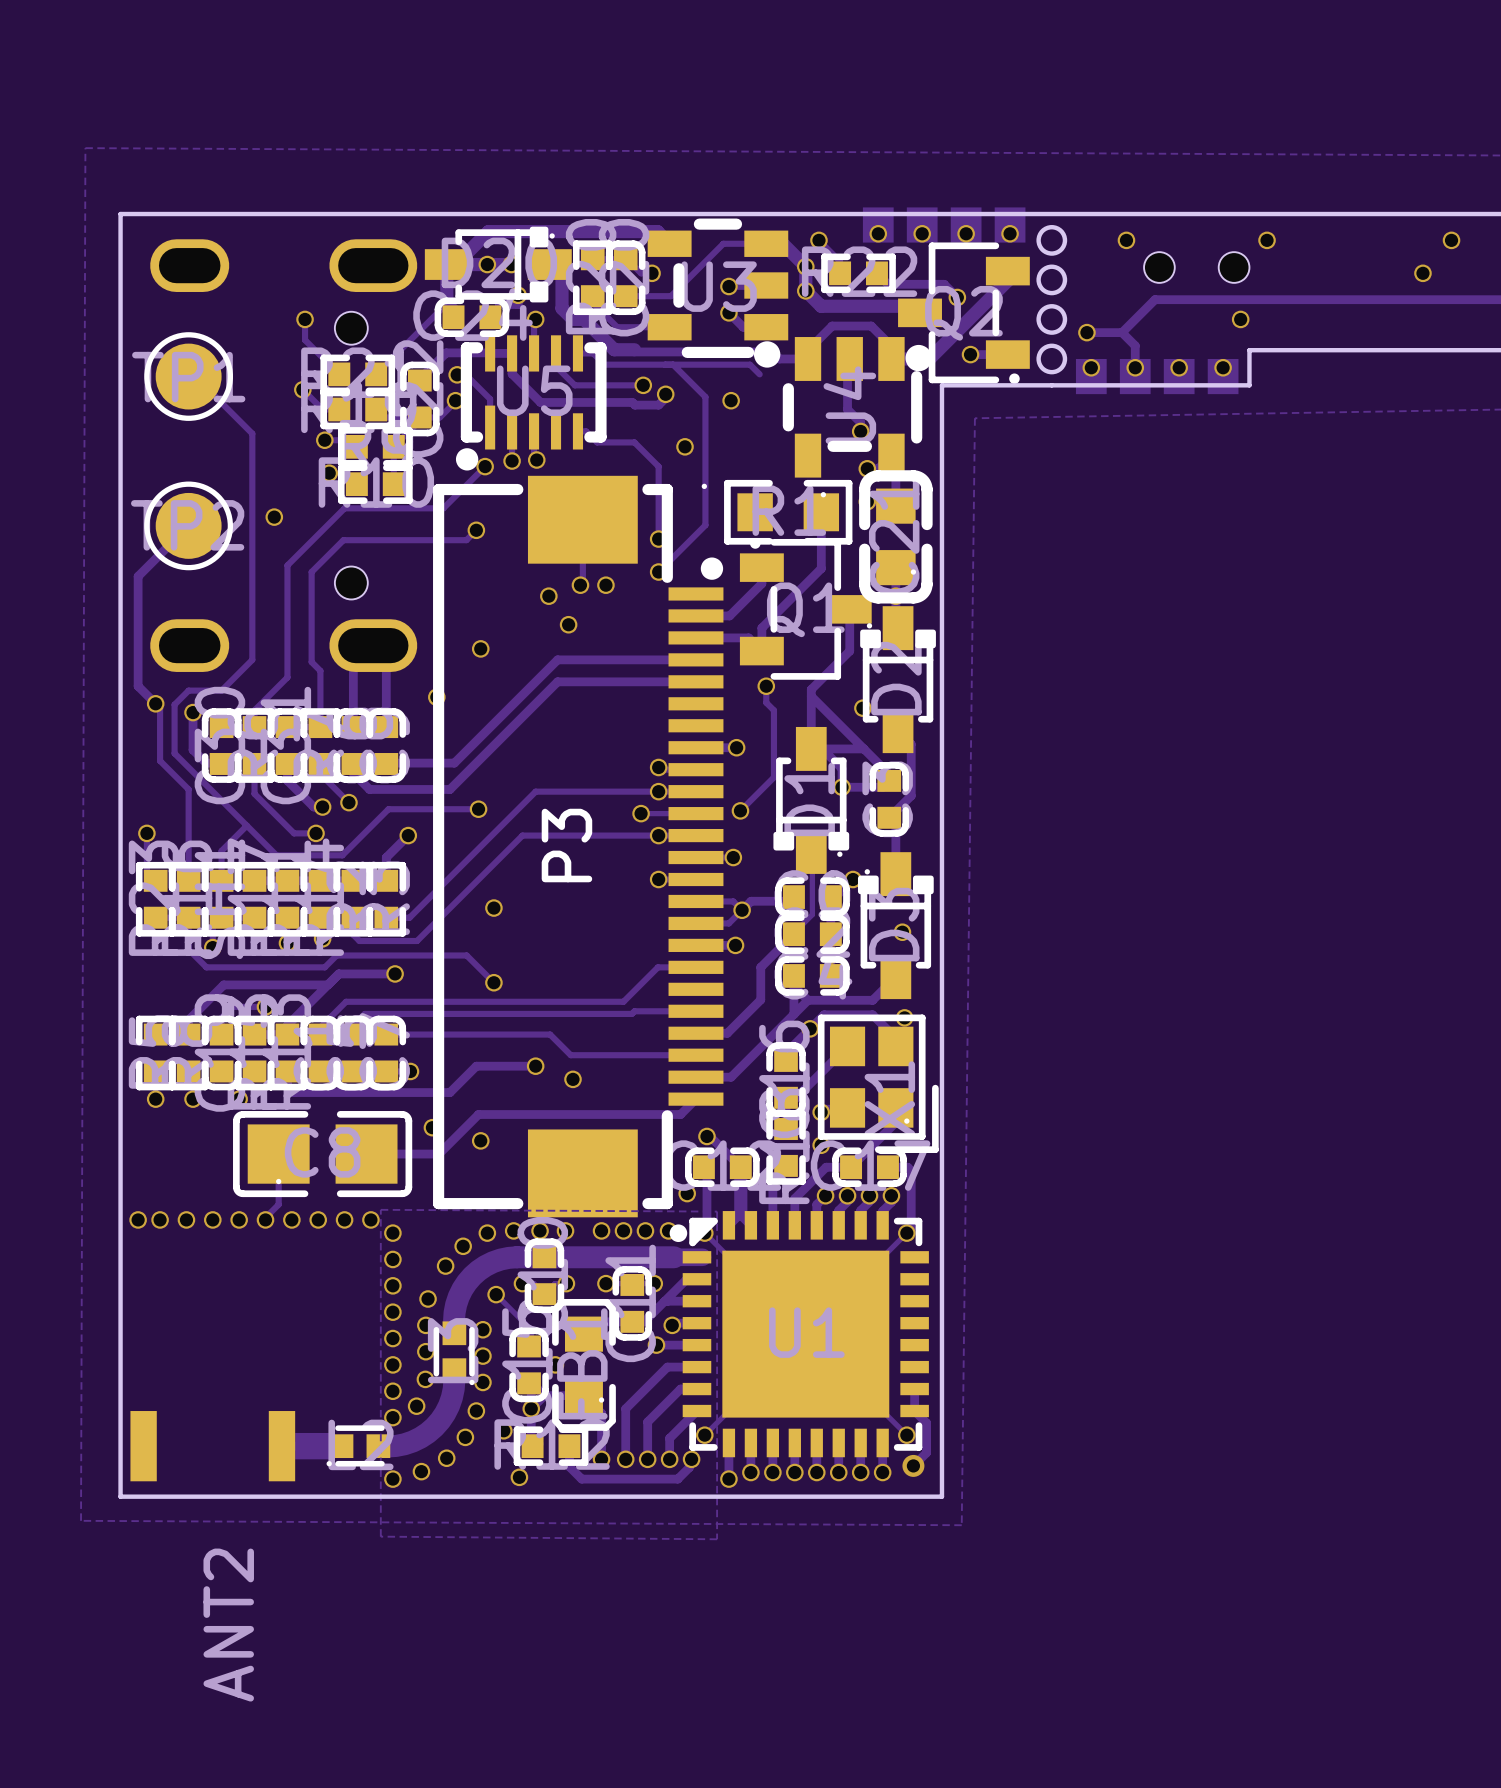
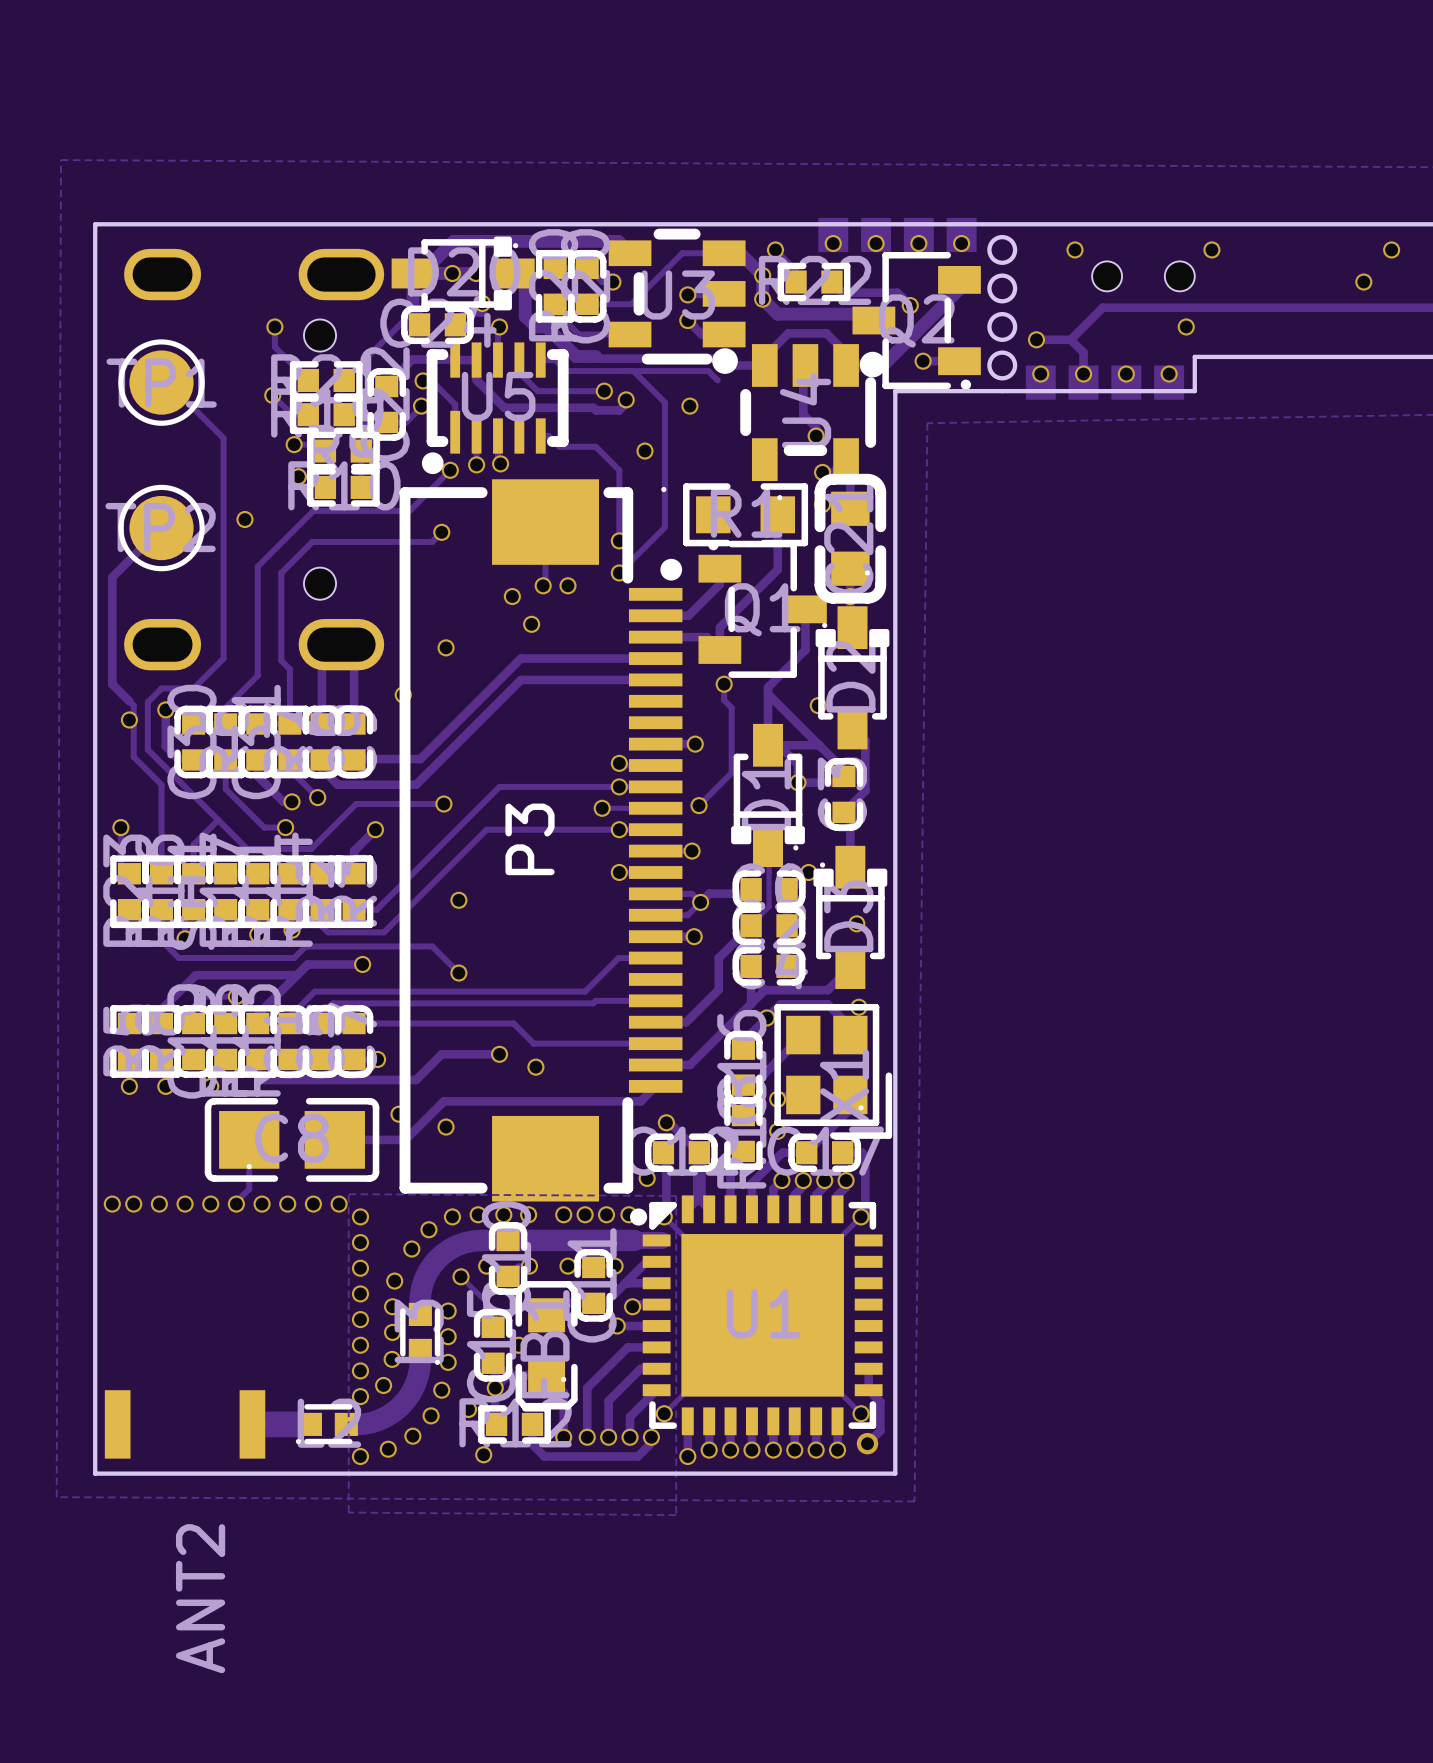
via position: (155, 703) -> (129, 720)

